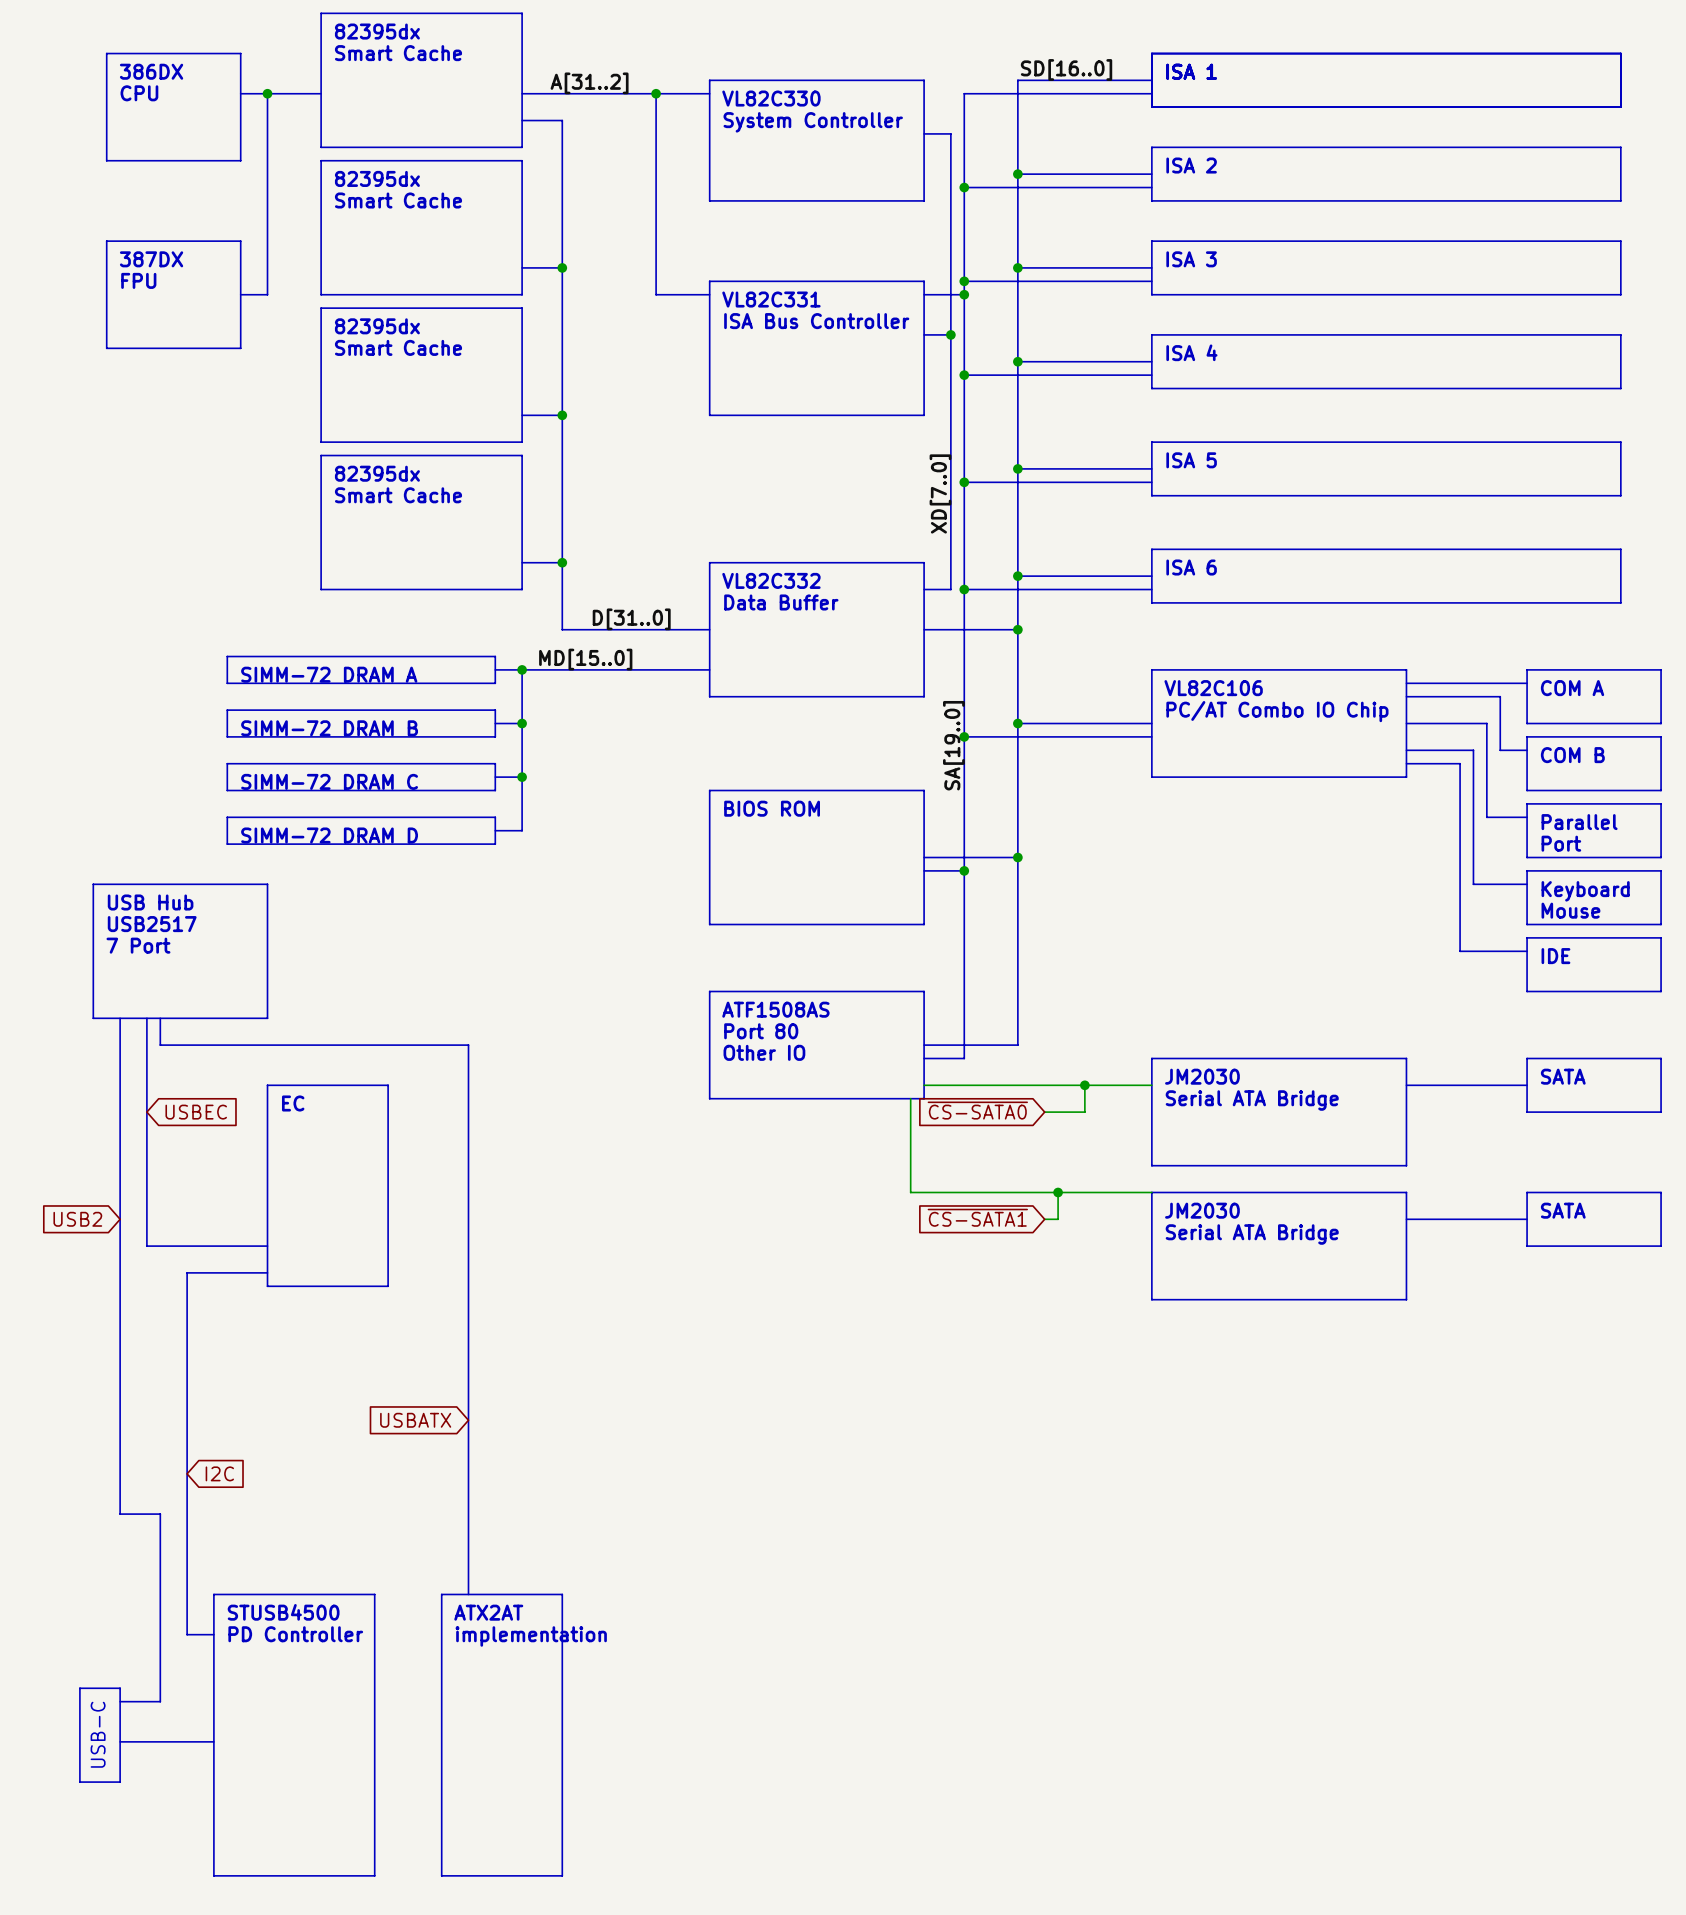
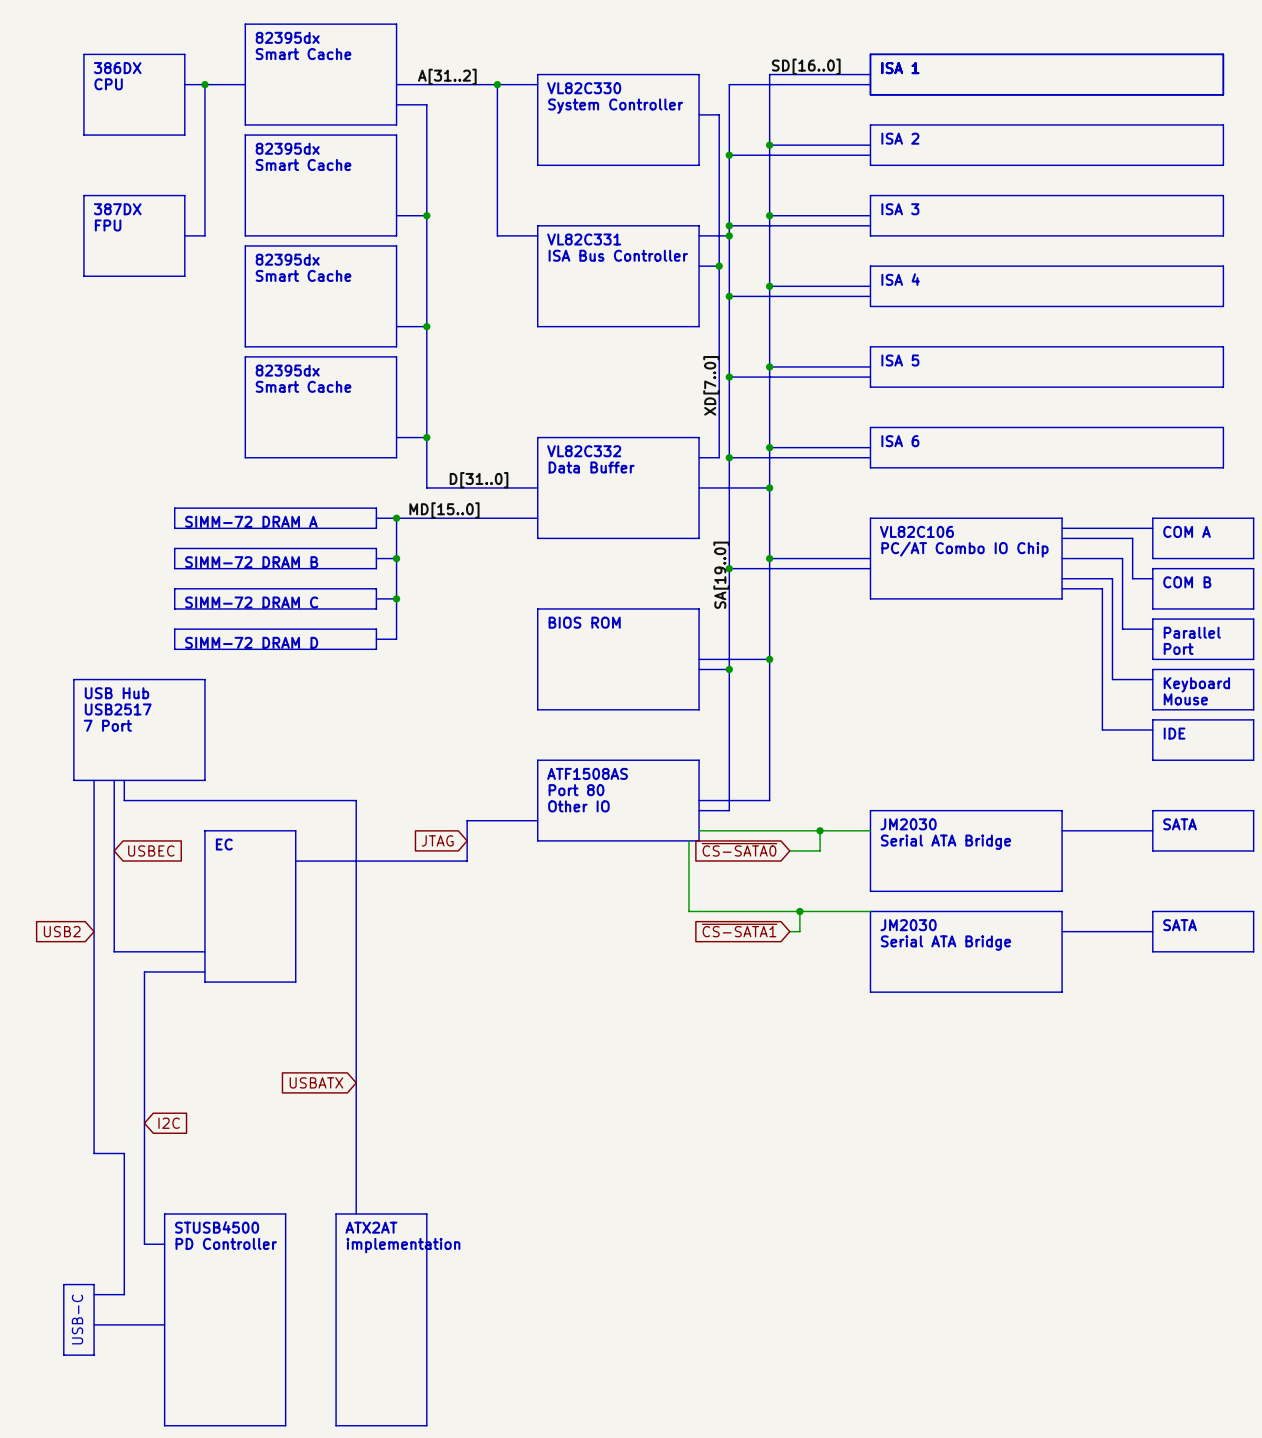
bus: none -> (537, 820) (467, 820) (467, 861) (295, 861)
global label: none -> JTAG (437, 840)

